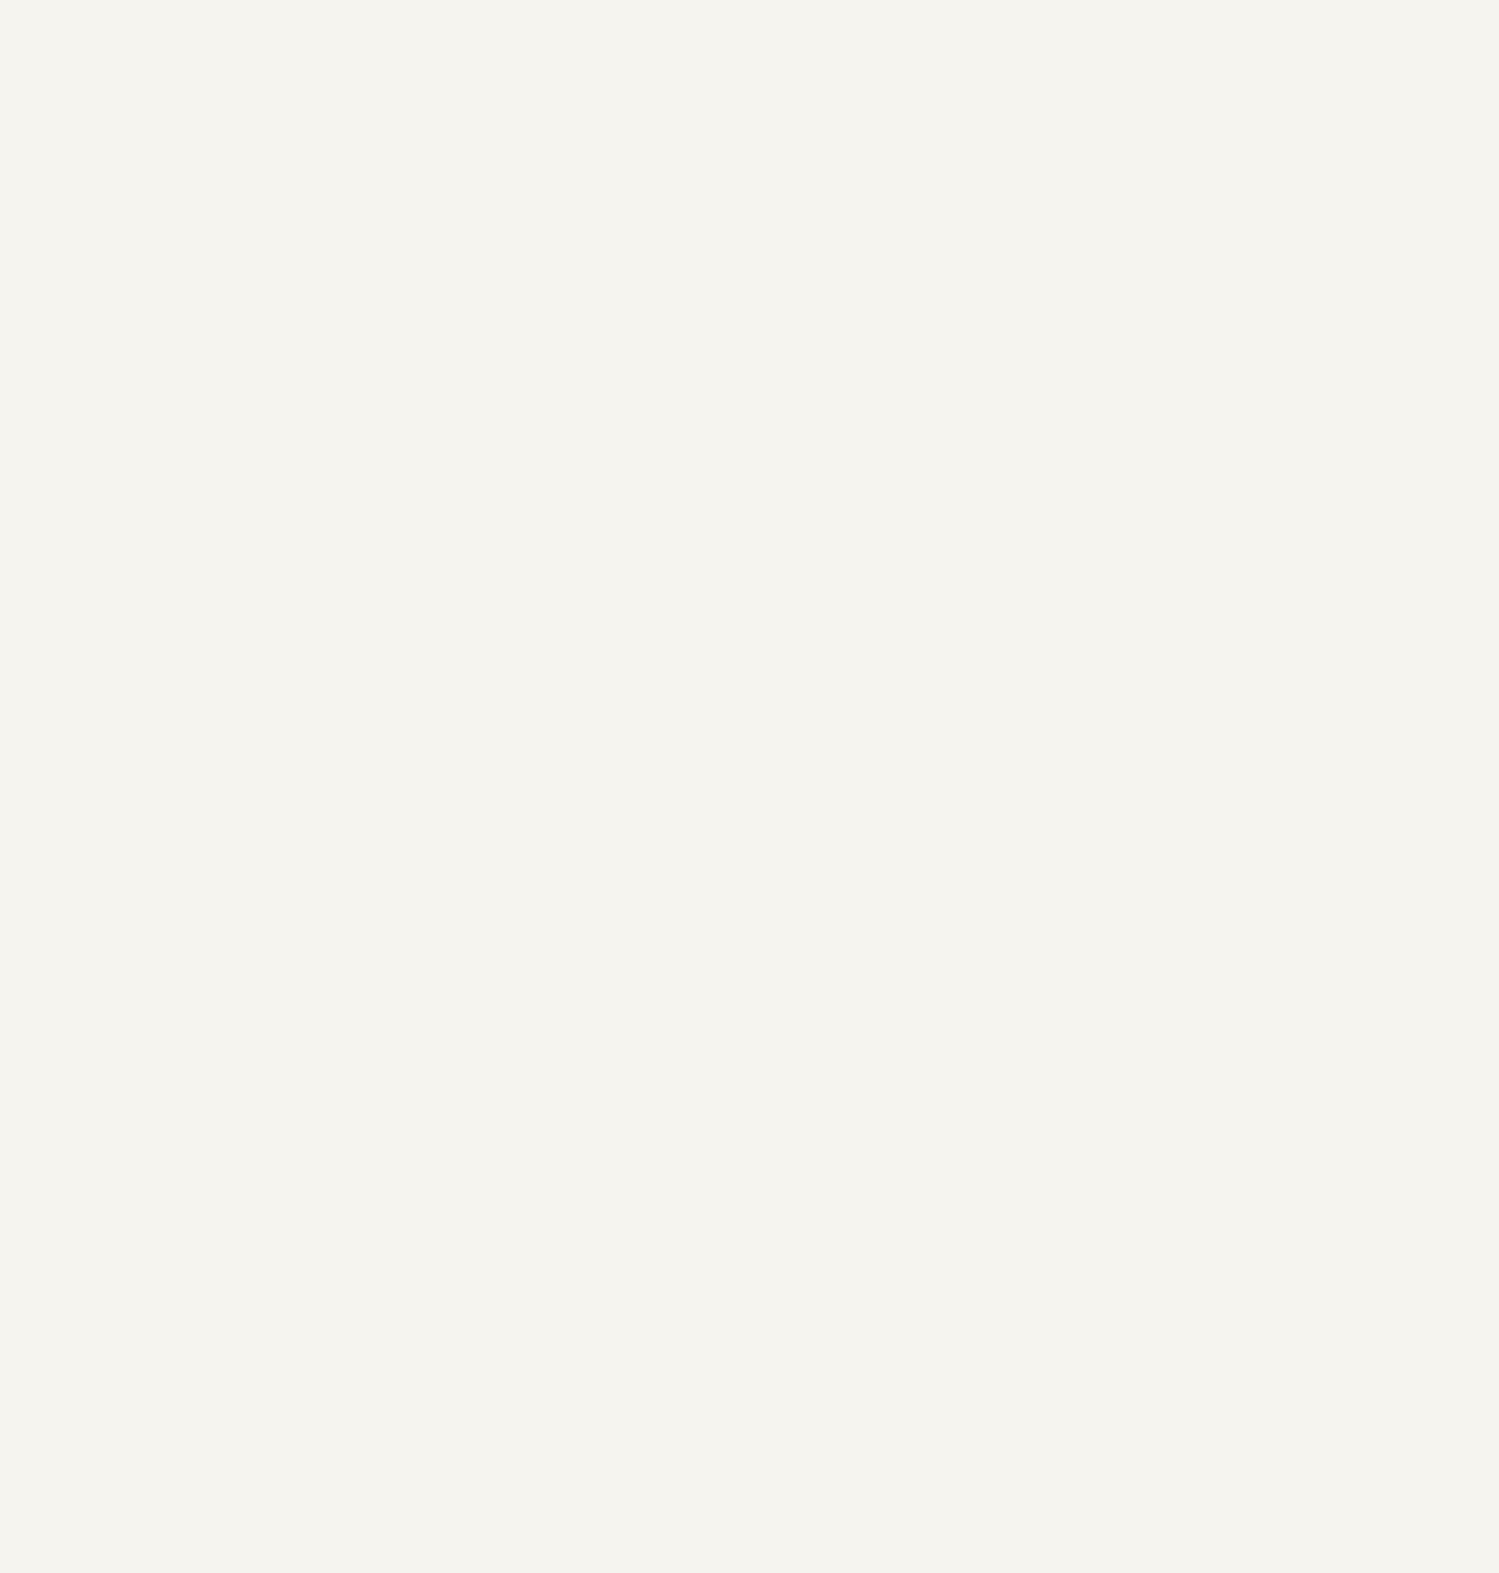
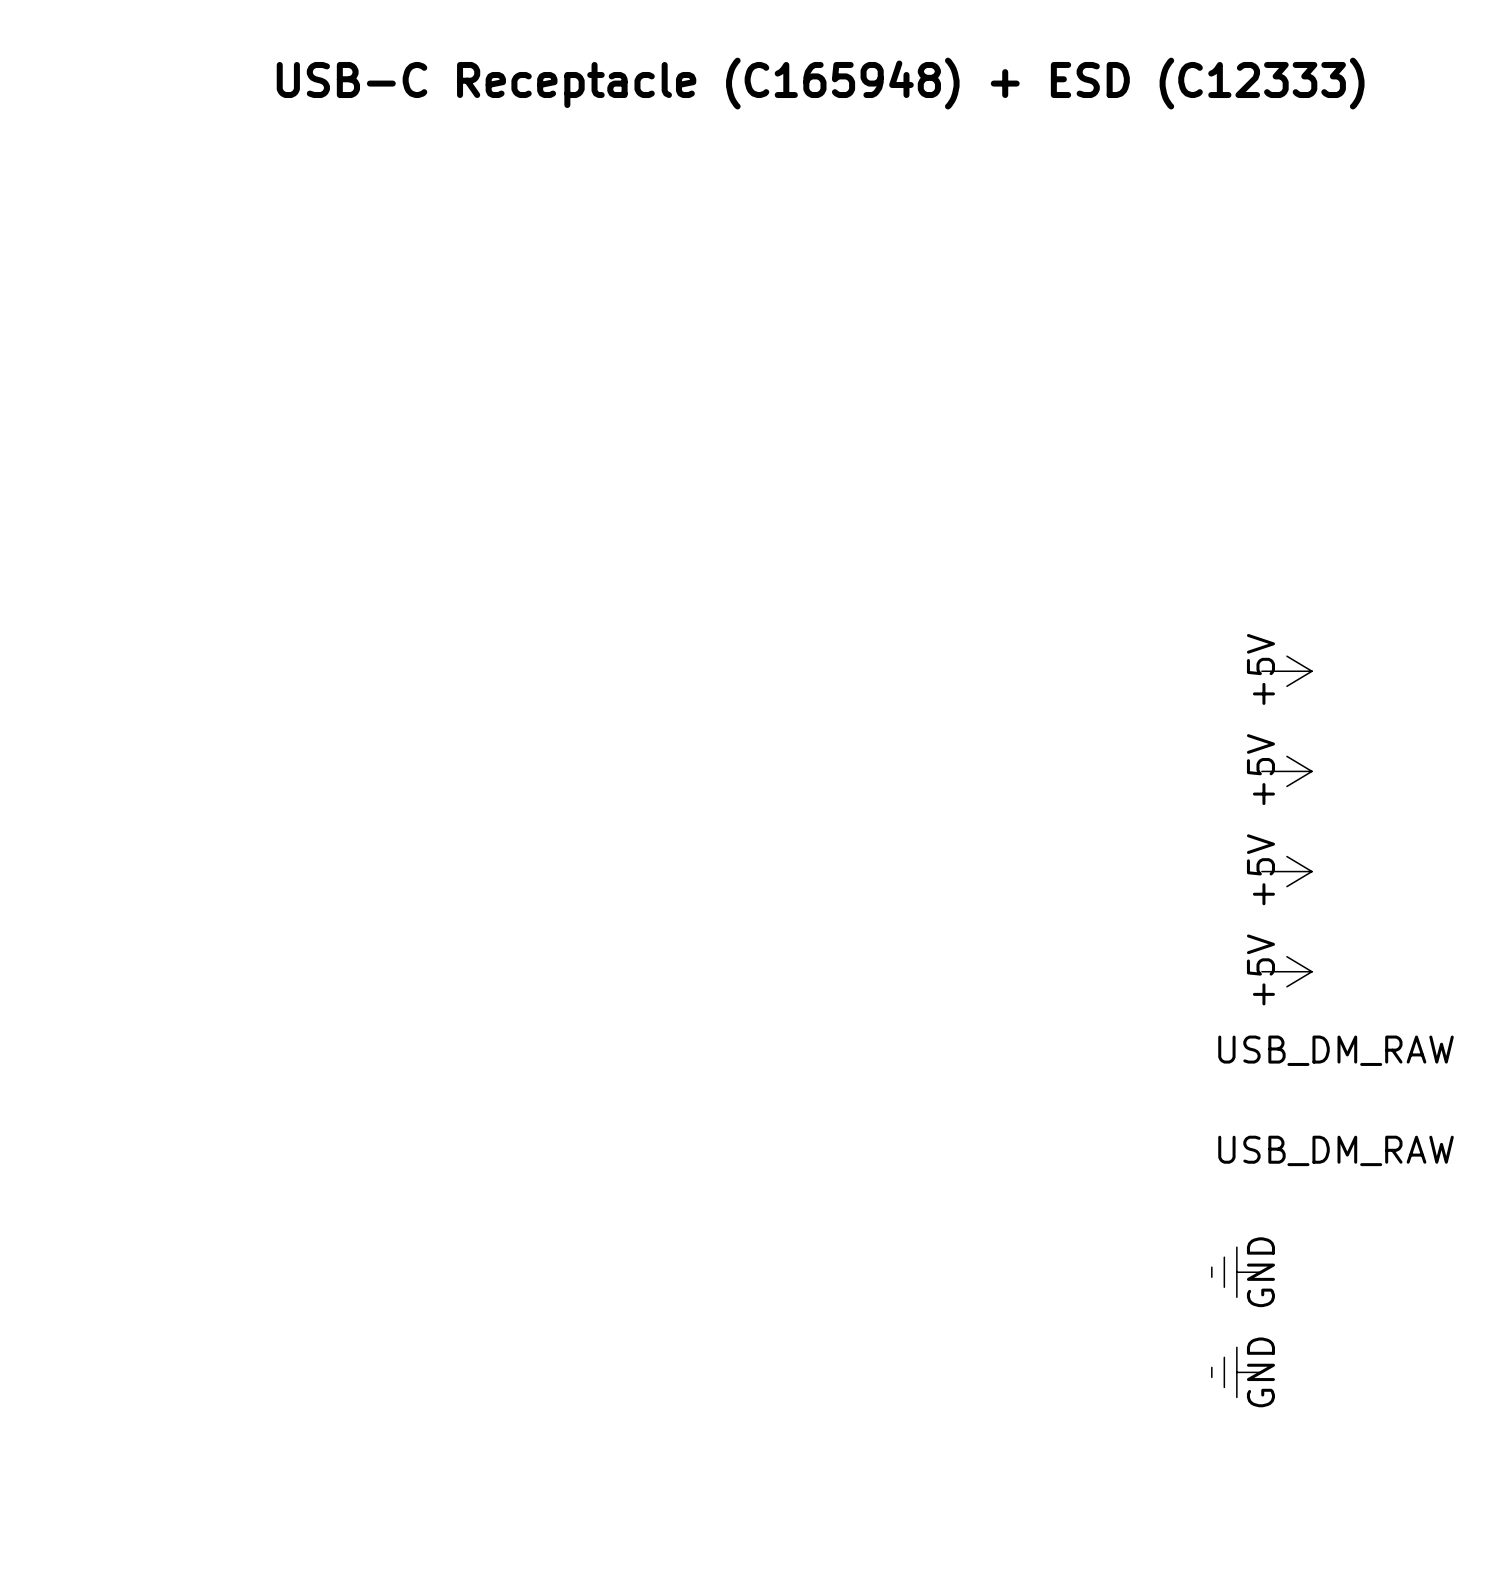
text: none -> USB-C Receptacle (C165948) + ESD (C12333) (820, 83)
power symbol: none -> +5V (1286, 671)
power symbol: none -> +5V (1286, 771)
power symbol: none -> +5V (1286, 871)
power symbol: none -> +5V (1286, 971)
label: none -> USB_DM_RAW (1336, 1050)
label: none -> USB_DM_RAW (1336, 1150)
power symbol: none -> GND (1236, 1272)
power symbol: none -> GND (1236, 1372)

